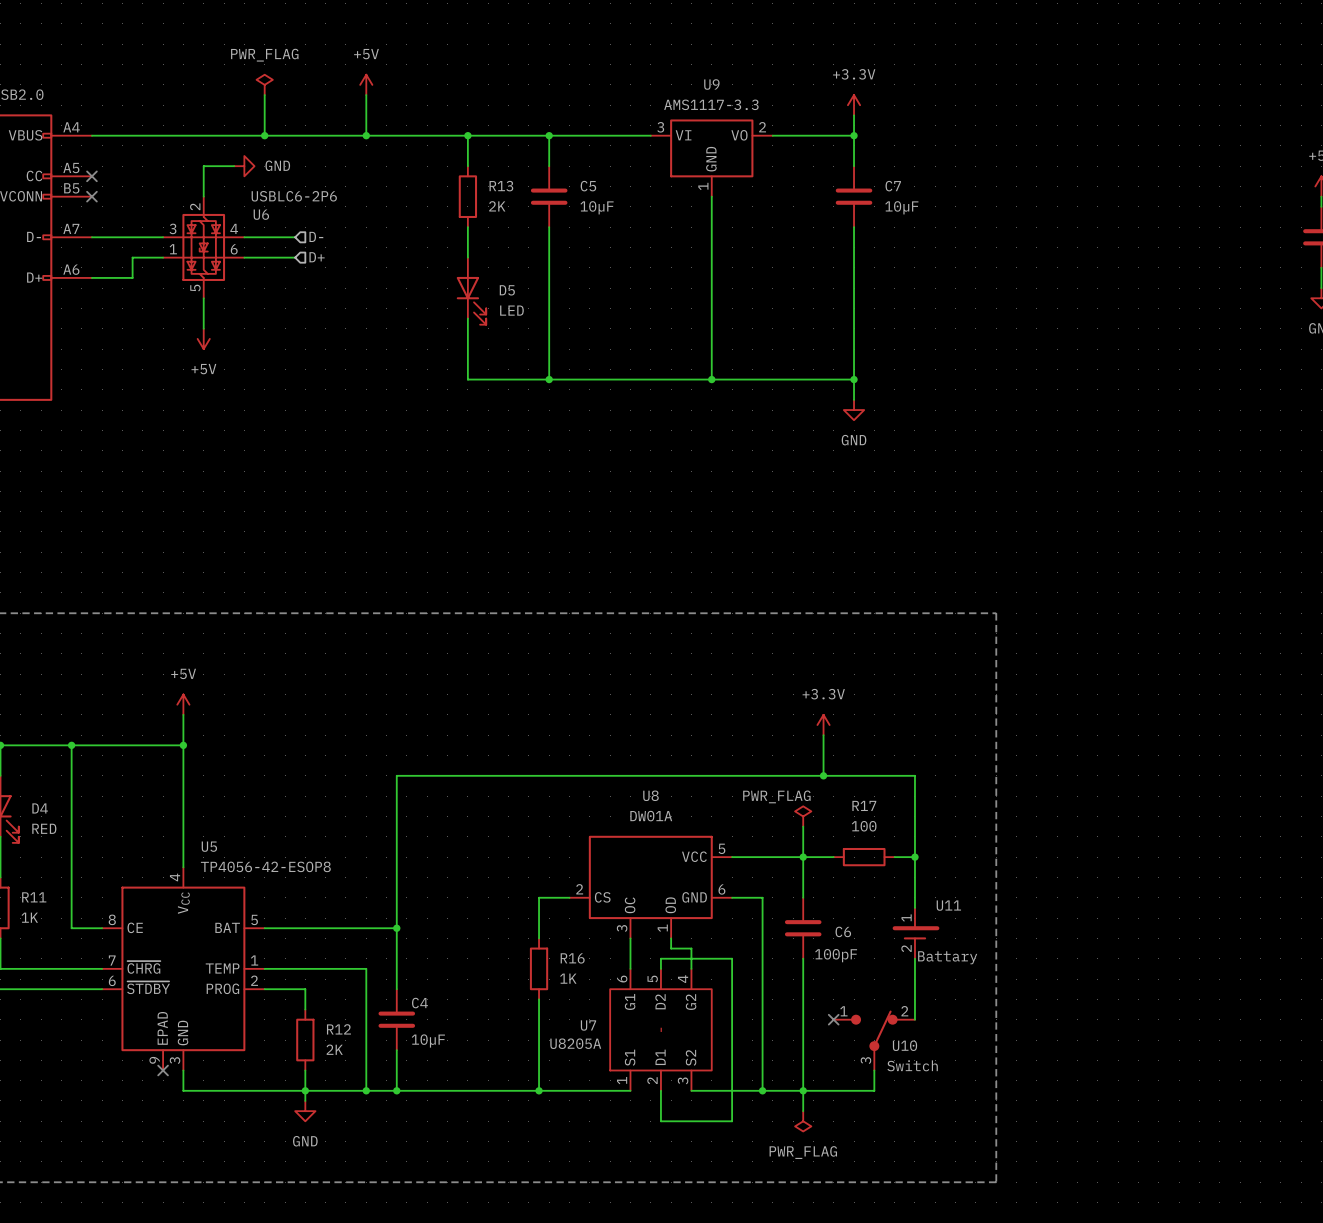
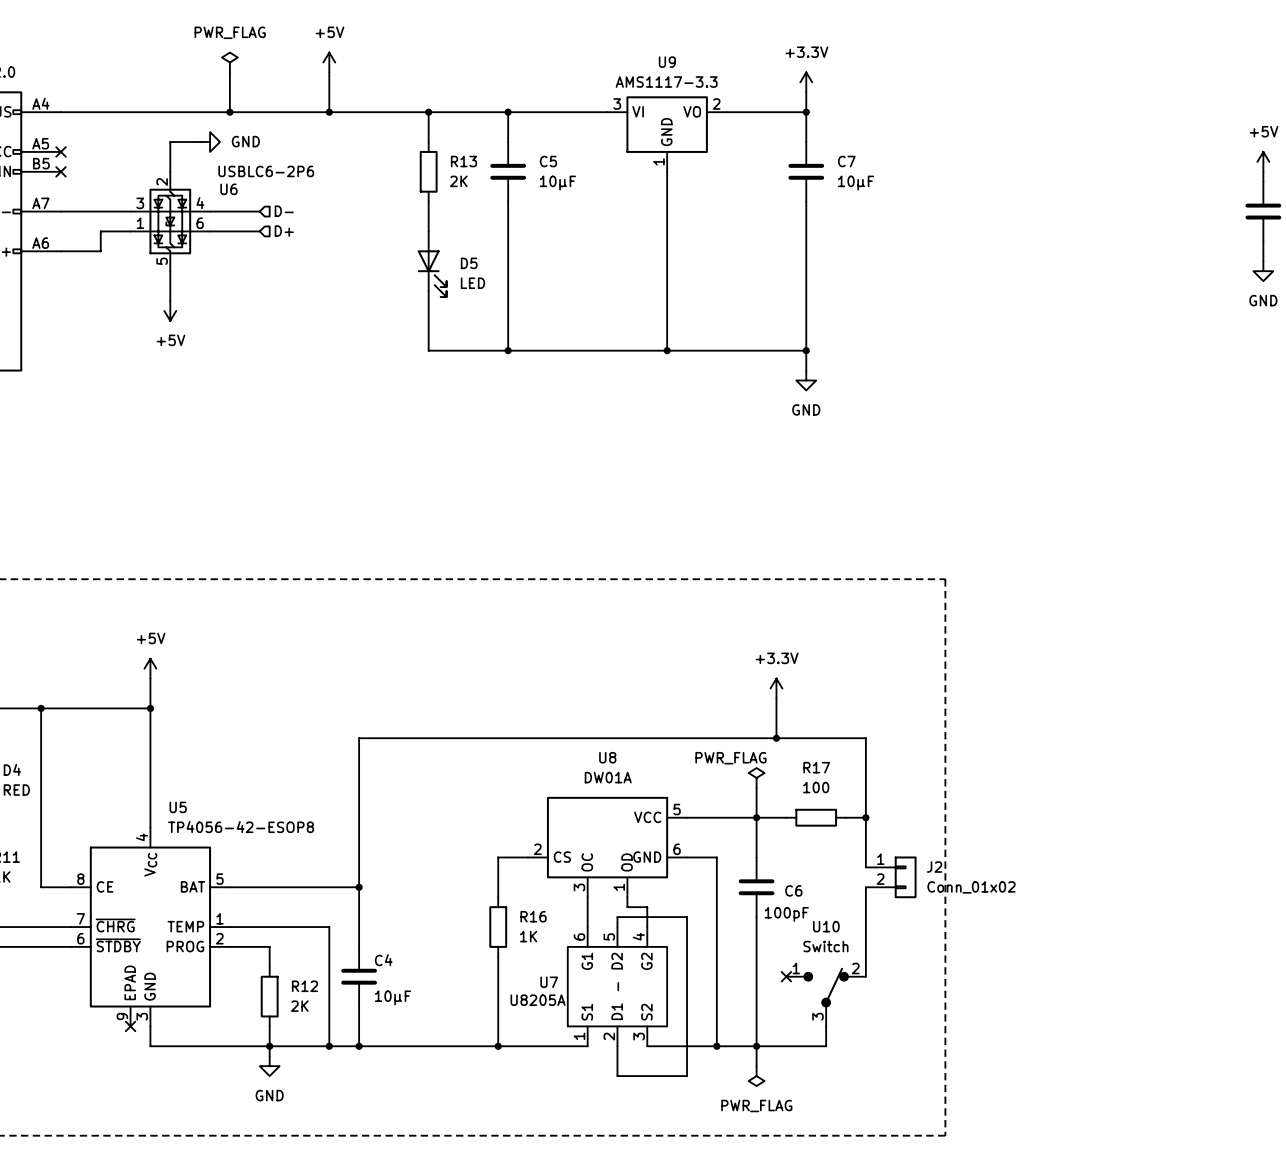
J2: none -> Conn_01x02 (891, 877)
U11: Battary (916, 933) -> none
U10 name position: U10 (905, 1045) -> U10 (826, 926)
U10 value position: Switch (912, 1065) -> Switch (825, 946)

